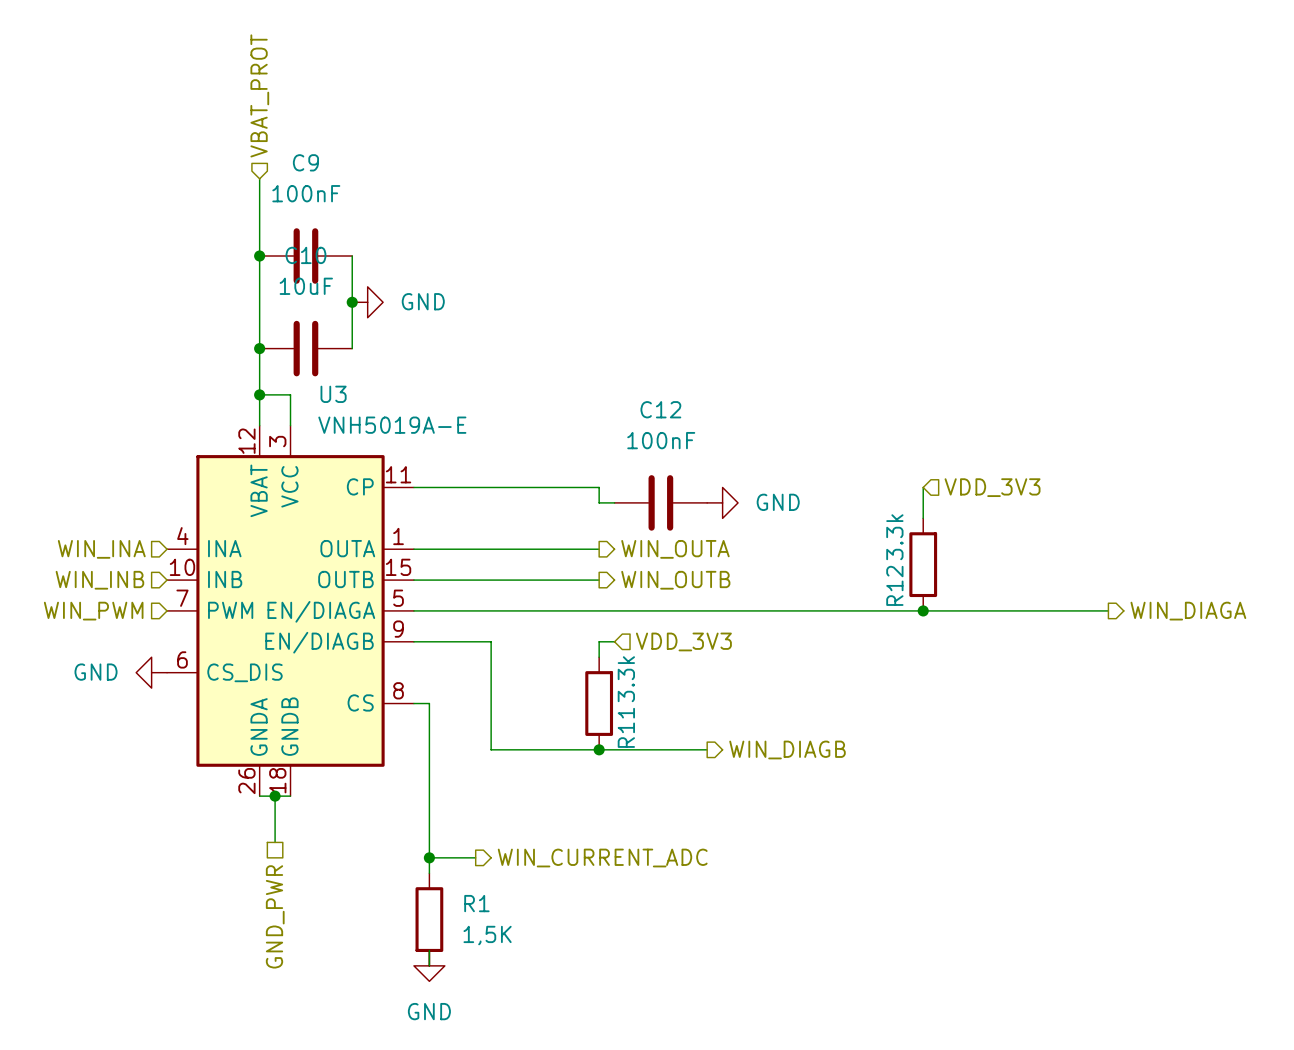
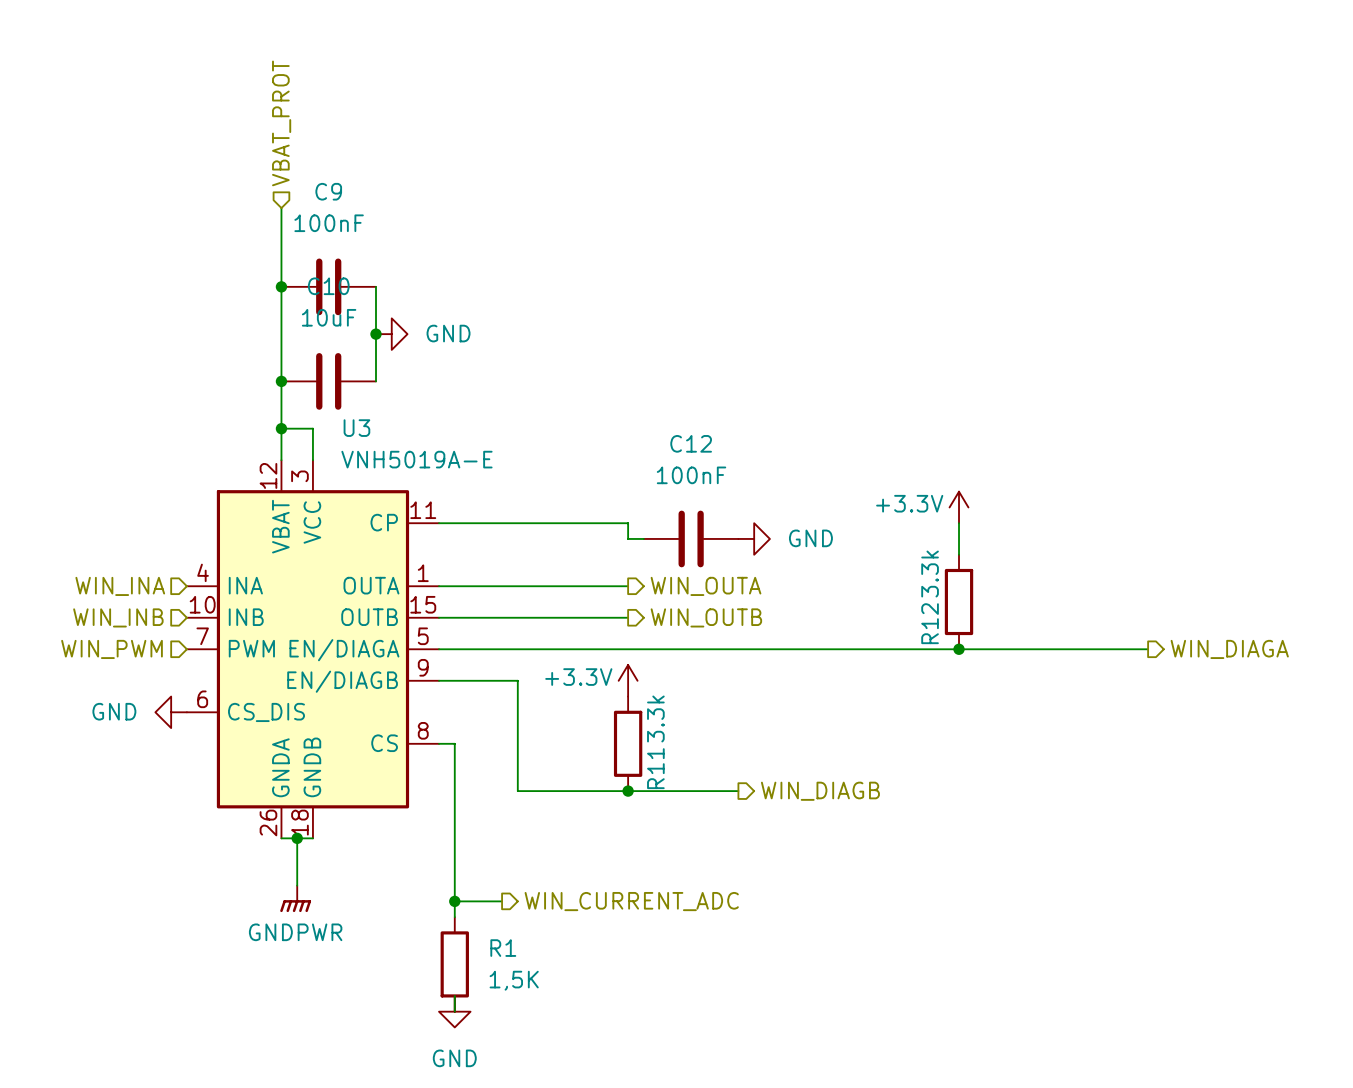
power symbol: none -> +3.3V (959, 507)
hierarchical label: VDD_3V3 (992, 487) -> none
power symbol: none -> +3.3V (628, 680)
hierarchical label: VDD_3V3 (683, 641) -> none
power symbol: none -> GNDPWR (295, 898)
hierarchical label: GND_PWR (275, 916) -> none

